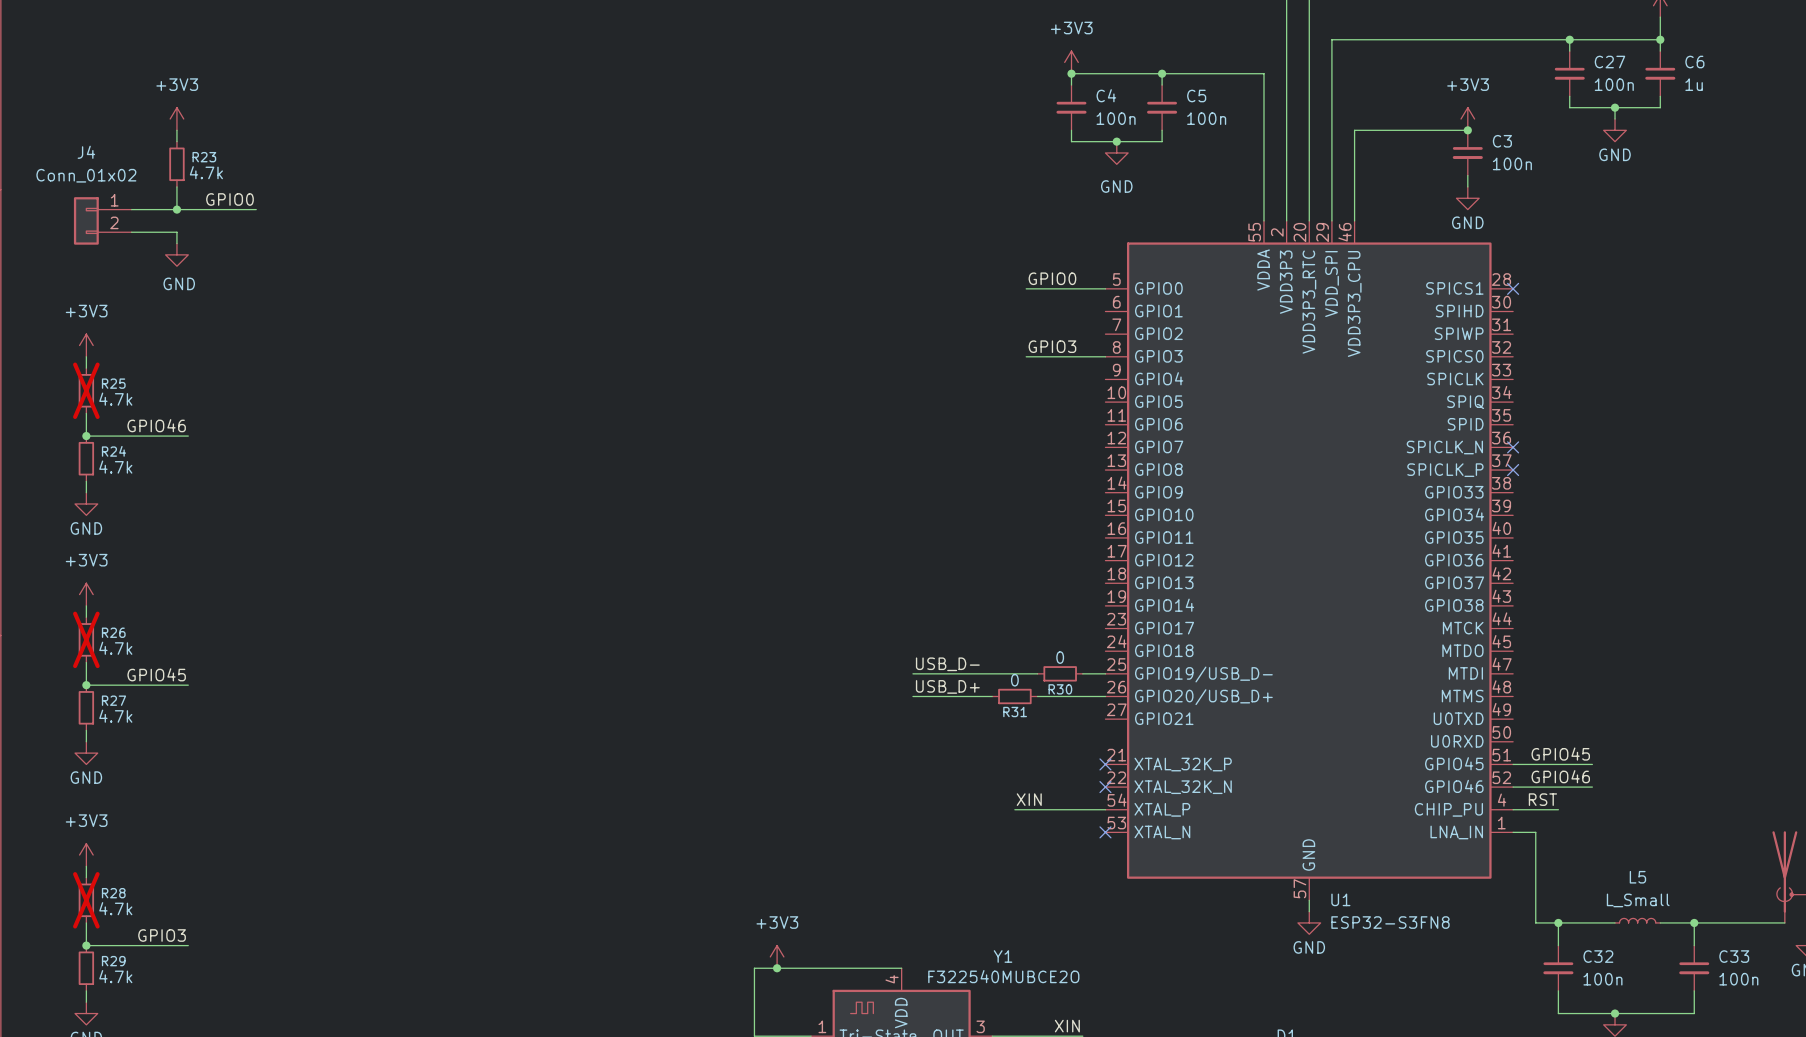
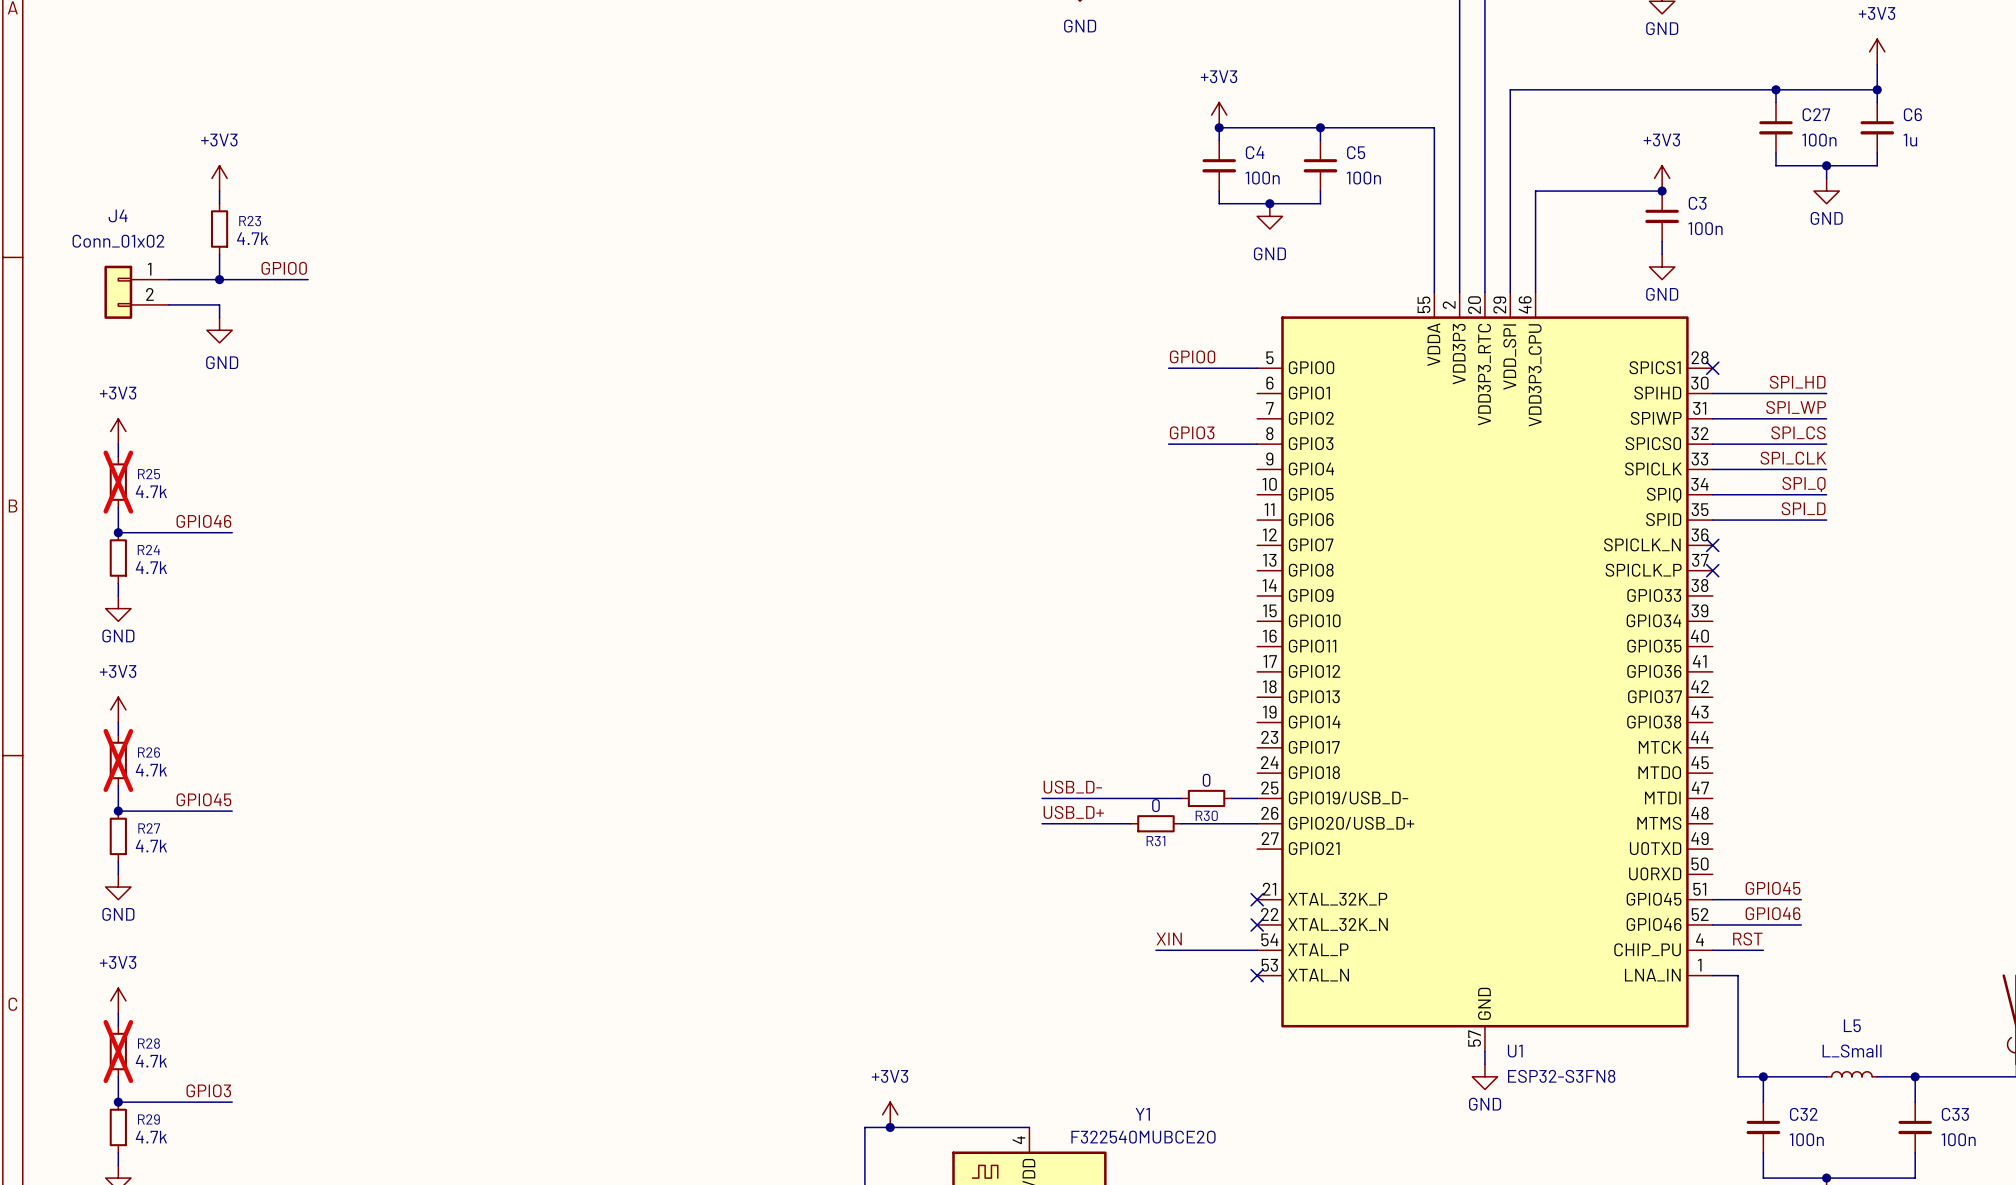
label: none -> SPI_HD (1797, 382)
wire: none -> (1712, 393) (1826, 393)
label: none -> SPI_WP (1796, 407)
wire: none -> (1712, 418) (1826, 418)
label: none -> SPI_CS (1798, 432)
wire: none -> (1712, 444) (1826, 444)
label: none -> SPI_CLK (1793, 458)
wire: none -> (1712, 469) (1826, 469)
label: none -> SPI_Q (1804, 484)
wire: none -> (1712, 494) (1826, 494)
label: none -> SPI_D (1803, 508)
wire: none -> (1712, 520) (1826, 520)

